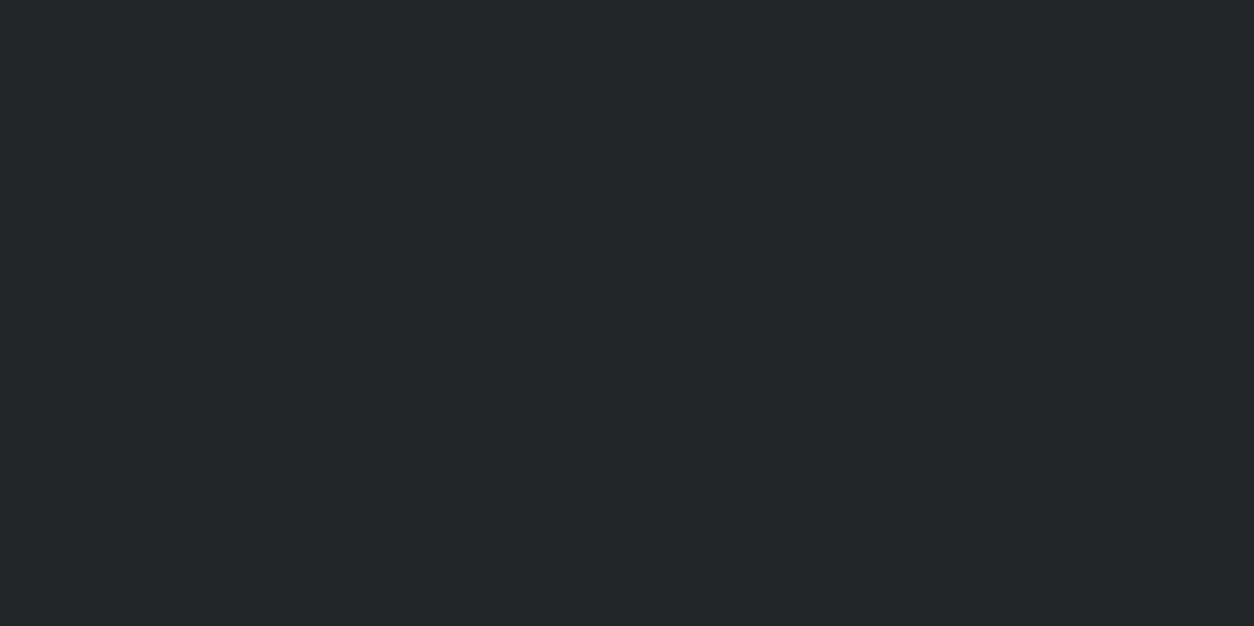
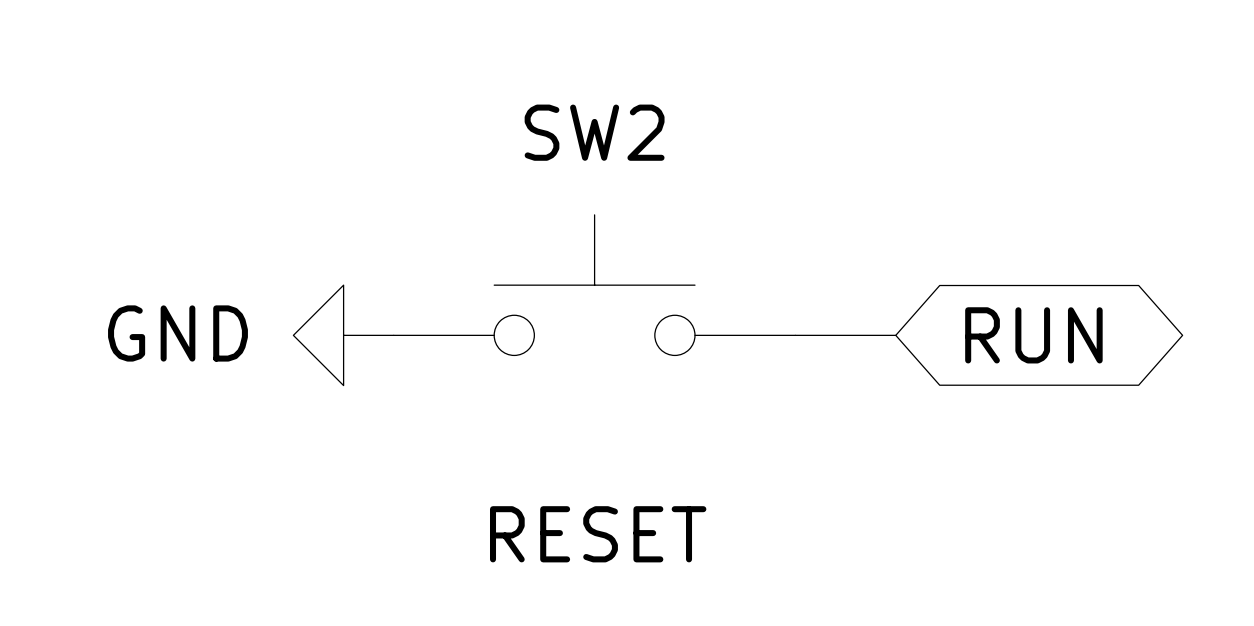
SW2: none -> RESET (594, 285)
power symbol: none -> GND (343, 335)
wire: none -> (795, 335) (895, 335)
global label: none -> RUN (1033, 335)

